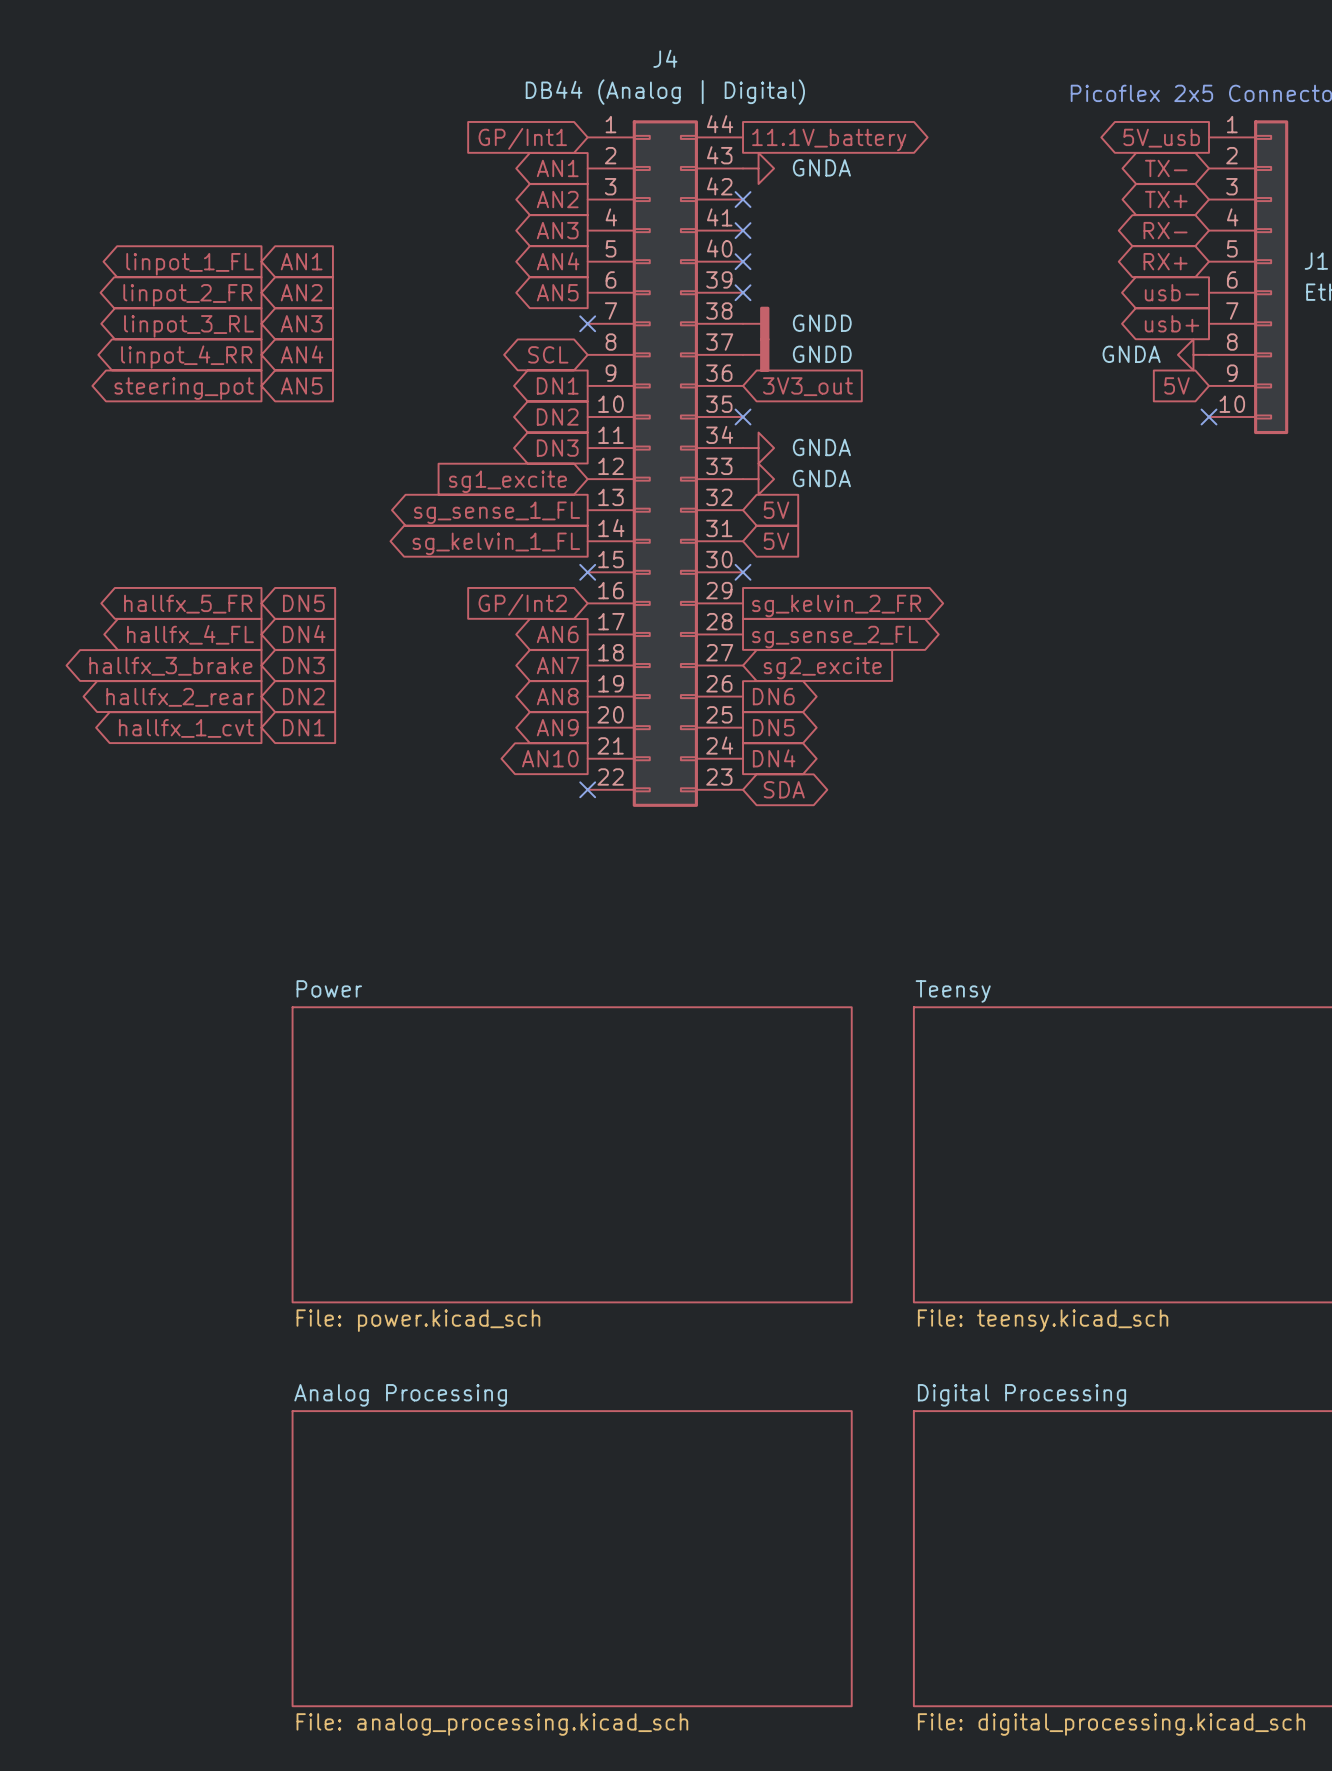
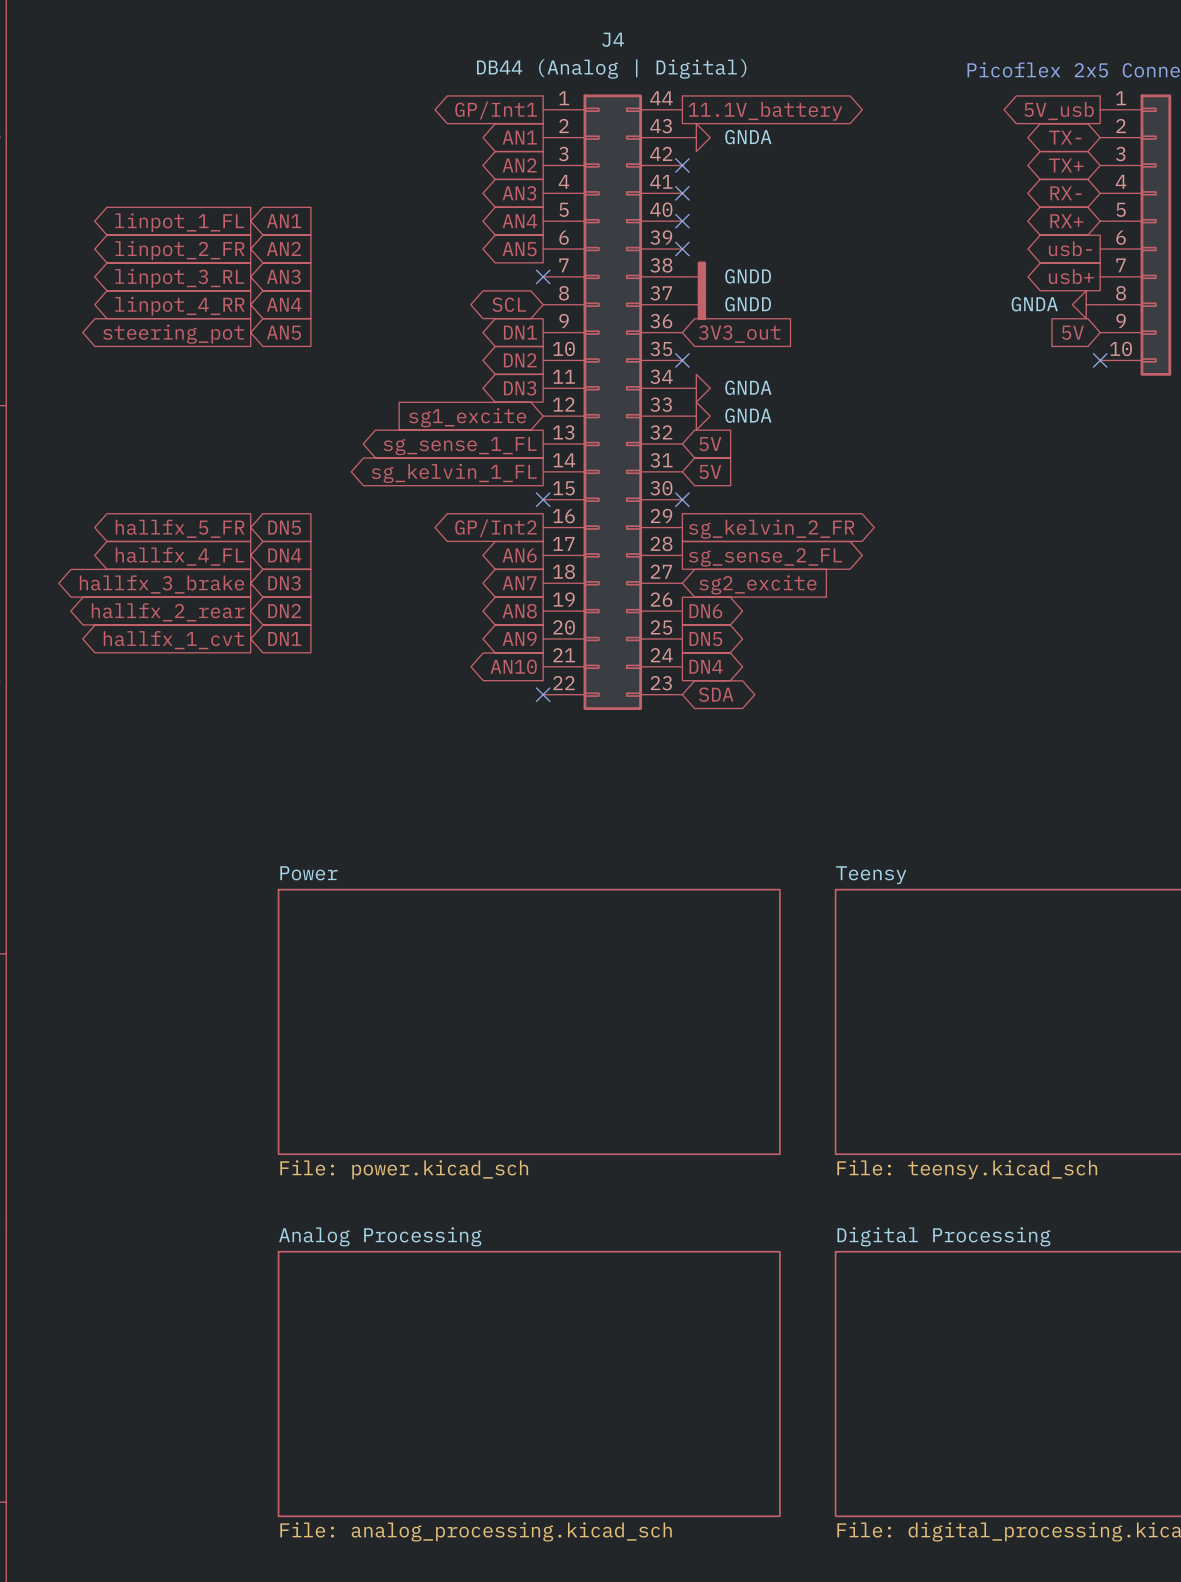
global label shape: input (522, 138) -> output (496, 110)
global label shape: input (522, 604) -> output (495, 528)

